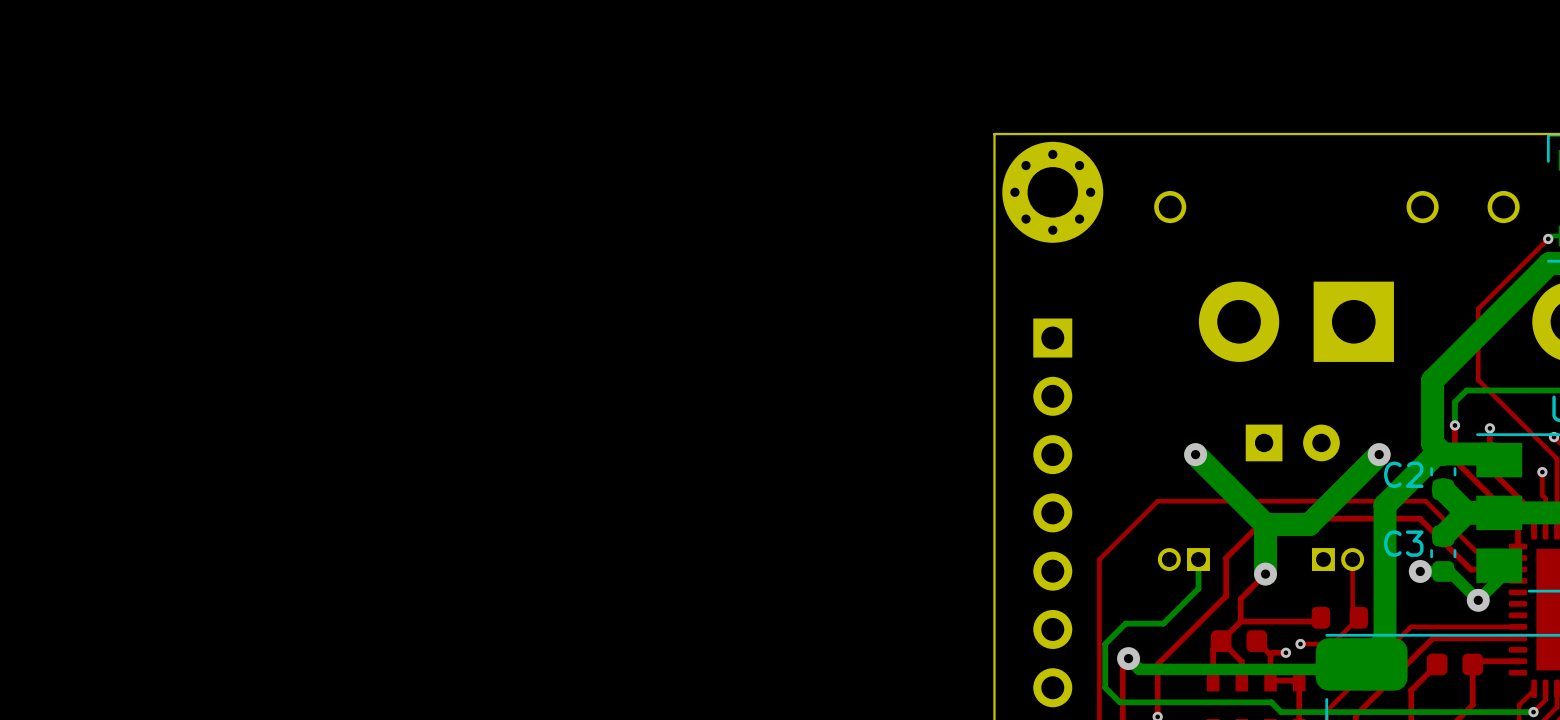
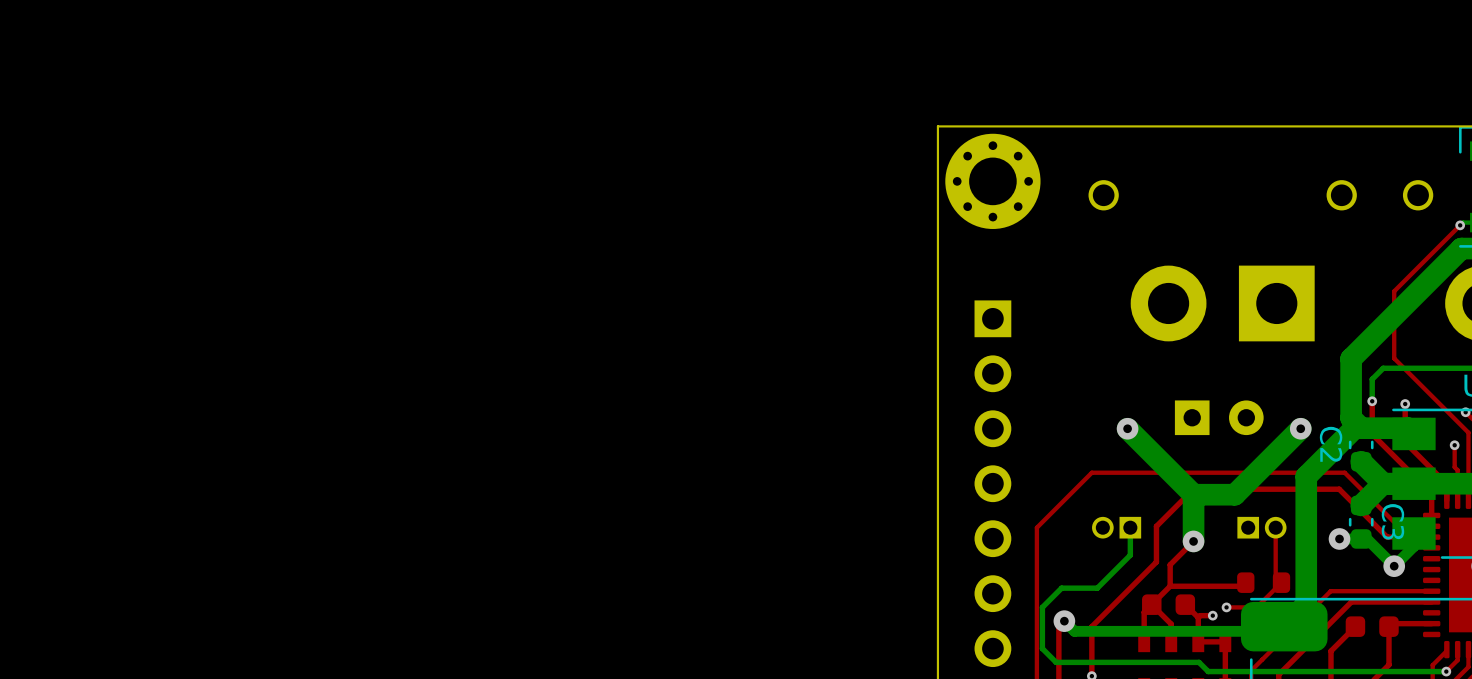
C2 name rotation: 0° (1403, 474) -> 90° clockwise (1331, 444)
C3 name rotation: 0° (1403, 543) -> 90° clockwise (1392, 521)
C3 name position: C3 (1403, 543) -> C3 (1392, 521)

